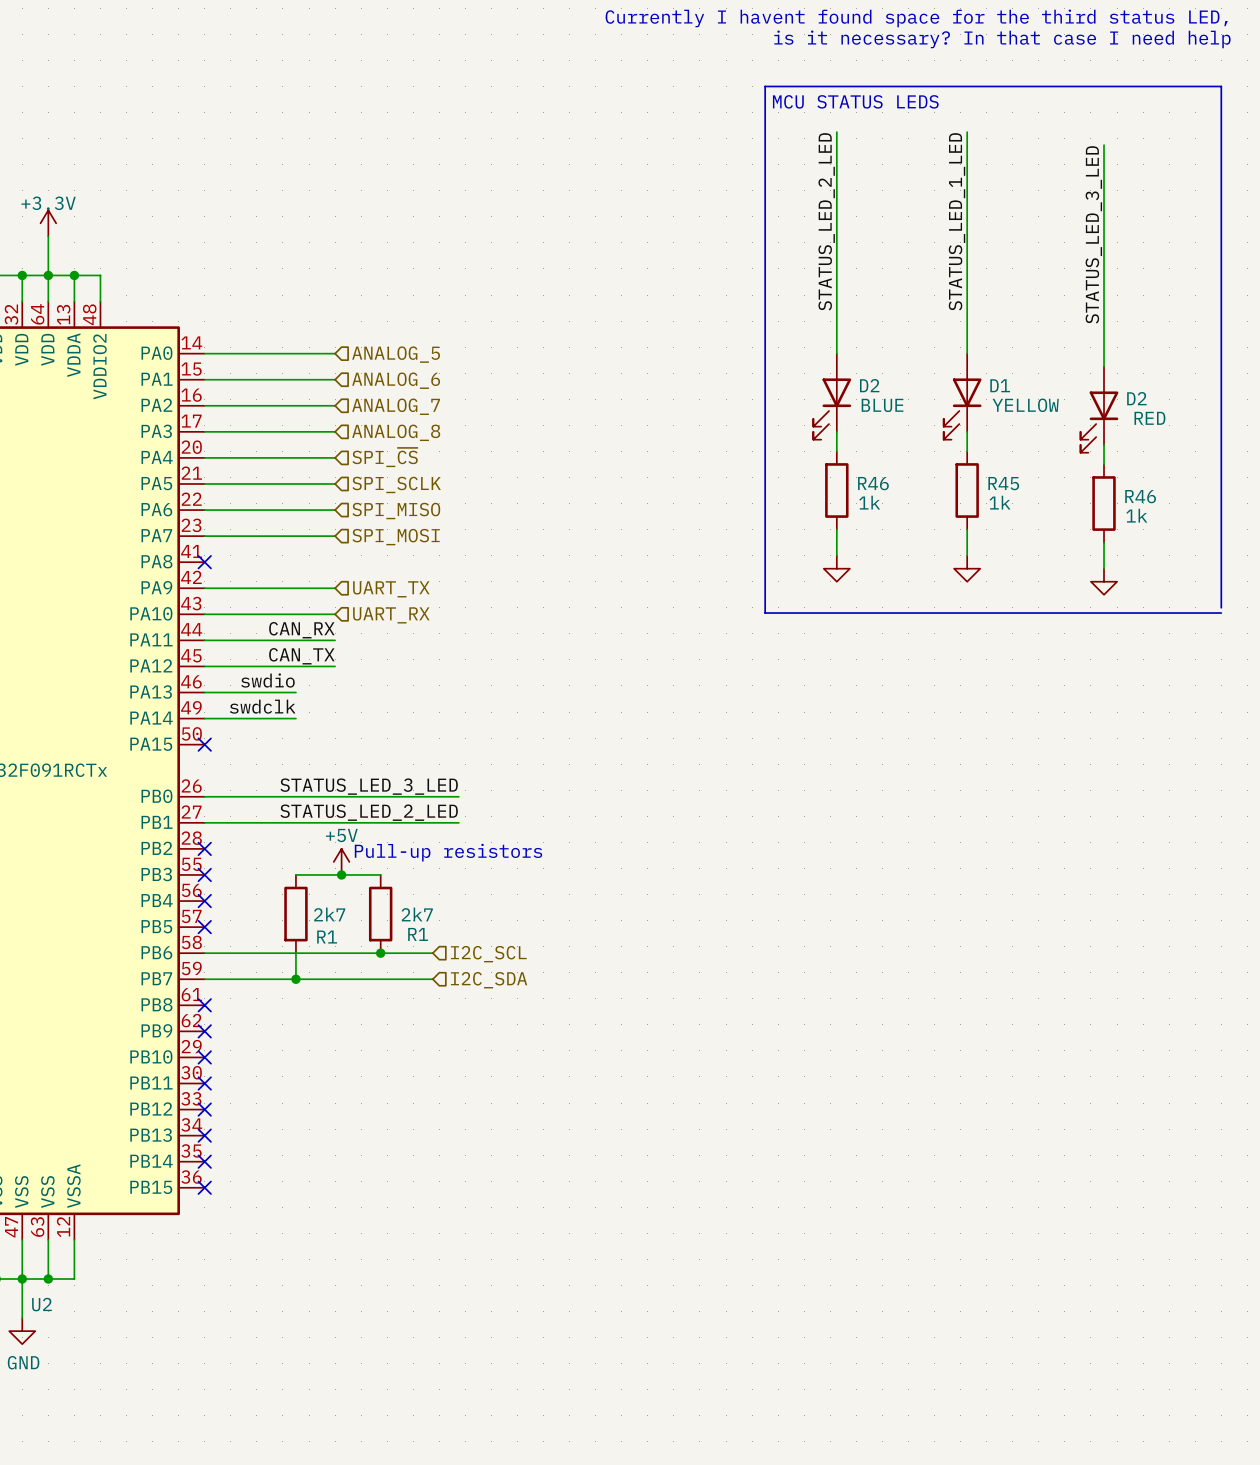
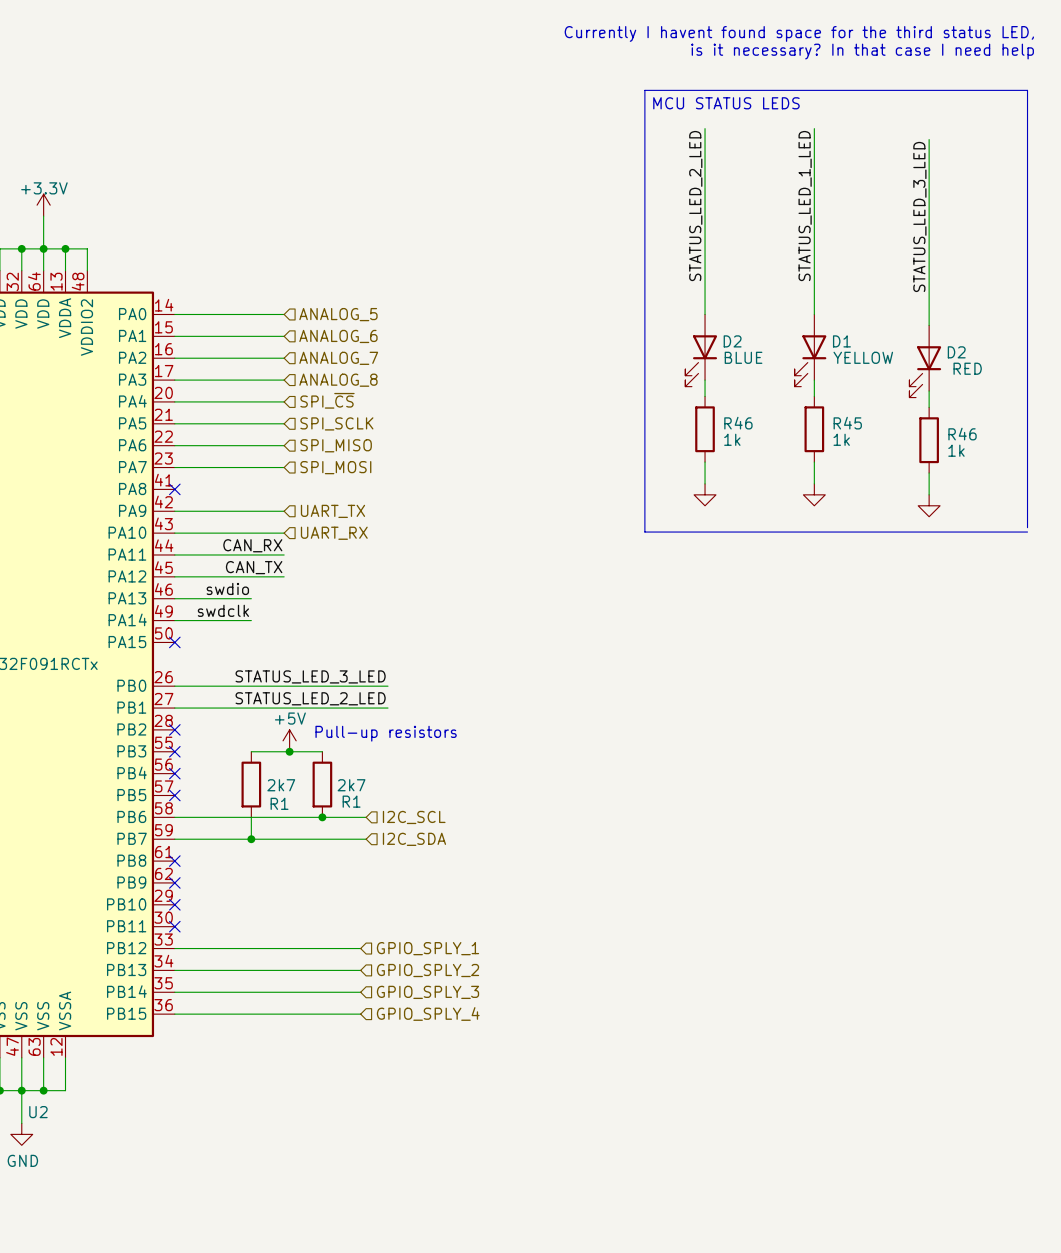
wire: none -> (174, 948) (360, 948)
no-connect mark: (204, 1109) -> none
hierarchical label: none -> GPIO_SPLY_1 (427, 948)
wire: none -> (174, 970) (360, 970)
no-connect mark: (204, 1135) -> none
hierarchical label: none -> GPIO_SPLY_2 (427, 970)
wire: none -> (174, 992) (360, 992)
no-connect mark: (204, 1161) -> none
hierarchical label: none -> GPIO_SPLY_3 (427, 992)
wire: none -> (174, 1014) (360, 1014)
no-connect mark: (204, 1187) -> none
hierarchical label: none -> GPIO_SPLY_4 (428, 1013)

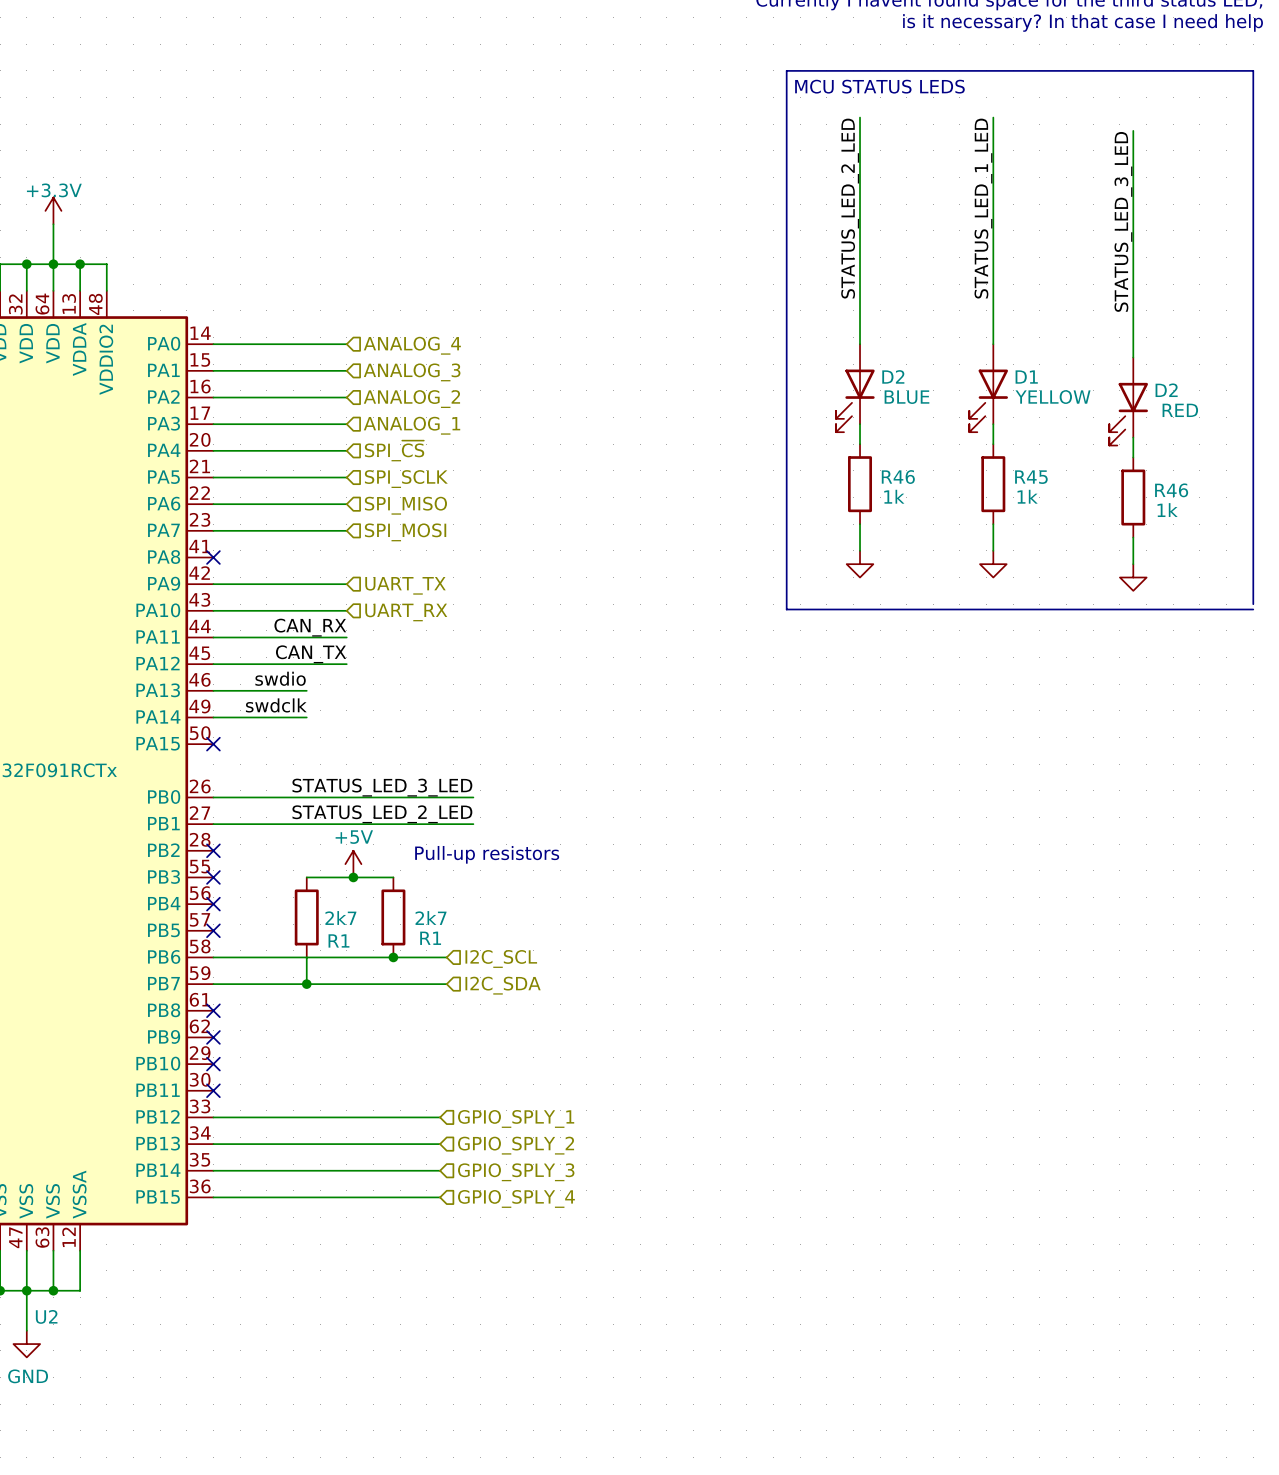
hierarchical label: ANALOG_5 (338, 314) -> ANALOG_4 (412, 345)
hierarchical label: ANALOG_6 (338, 336) -> ANALOG_3 (412, 372)
hierarchical label: ANALOG_7 (338, 358) -> ANALOG_2 (411, 399)
hierarchical label: ANALOG_8 (338, 380) -> ANALOG_1 (412, 425)

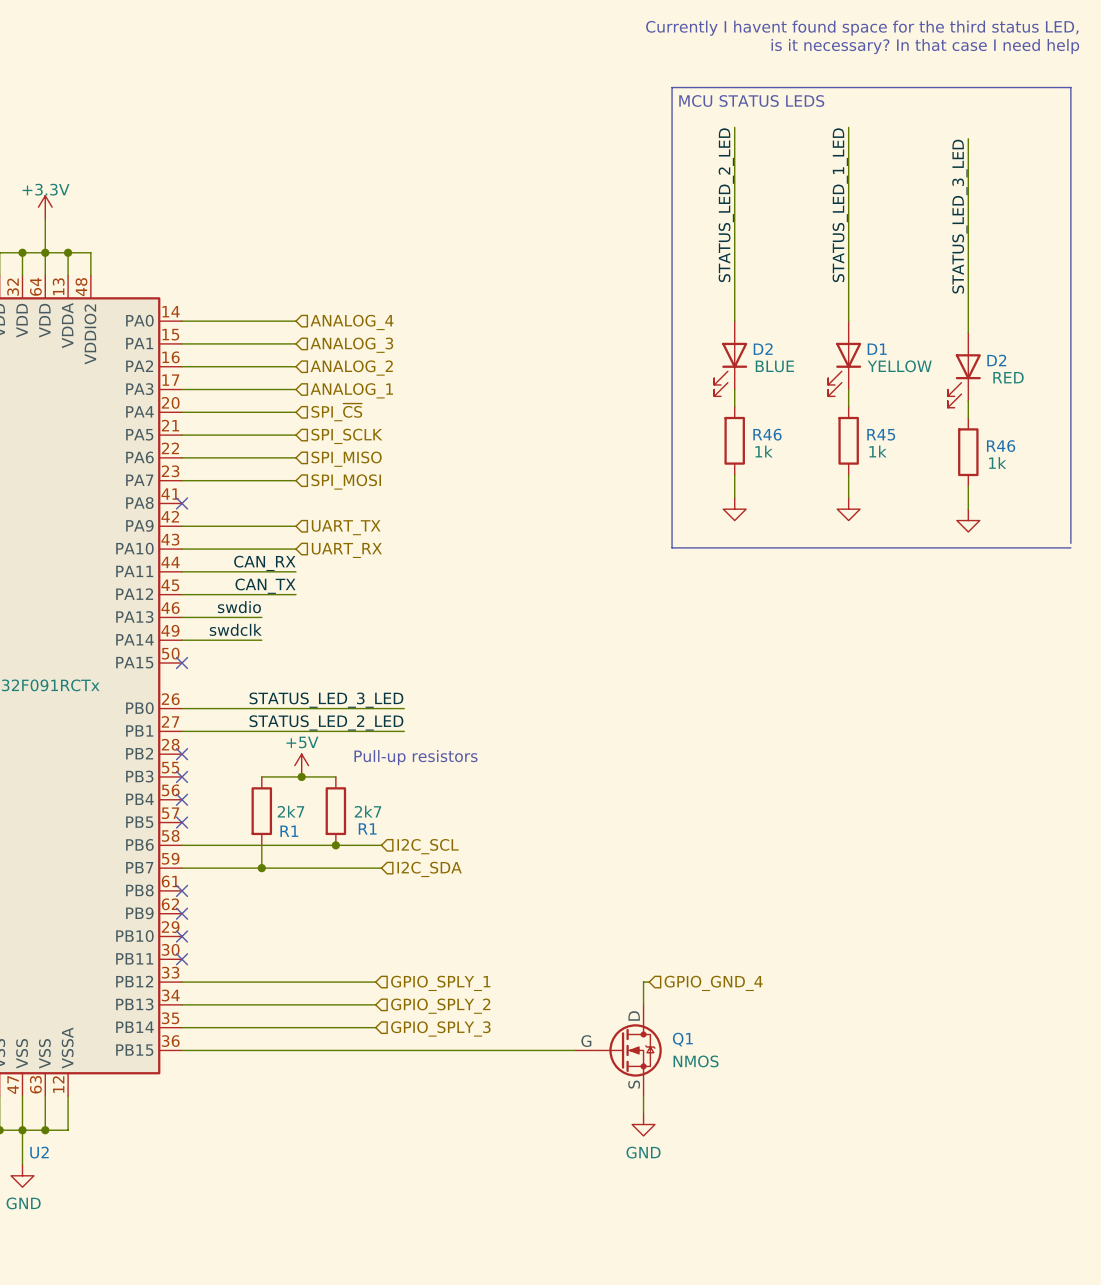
wire: none -> (649, 982) (643, 982) (643, 1004)
hierarchical label: none -> GPIO_GND_4 (713, 983)
wire: none -> (375, 1050) (575, 1050)
Q1: none -> NMOS (618, 1050)
hierarchical label: GPIO_SPLY_4 (516, 1198) -> none
wire: none -> (643, 1096) (643, 1113)
power symbol: none -> GND (643, 1124)

